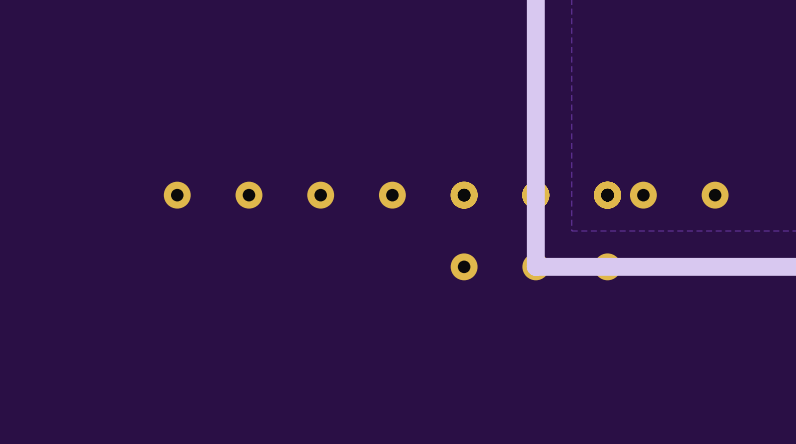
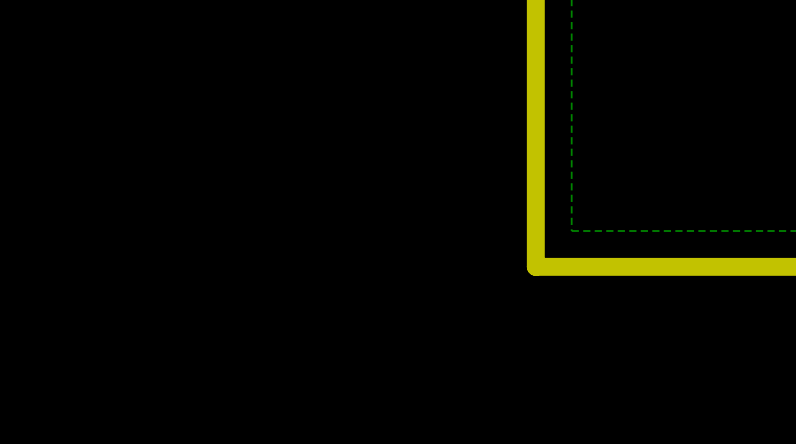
part: (535, 195) -> none
part: (571, 195) -> none
part: (679, 195) -> none
part: (392, 231) -> none

